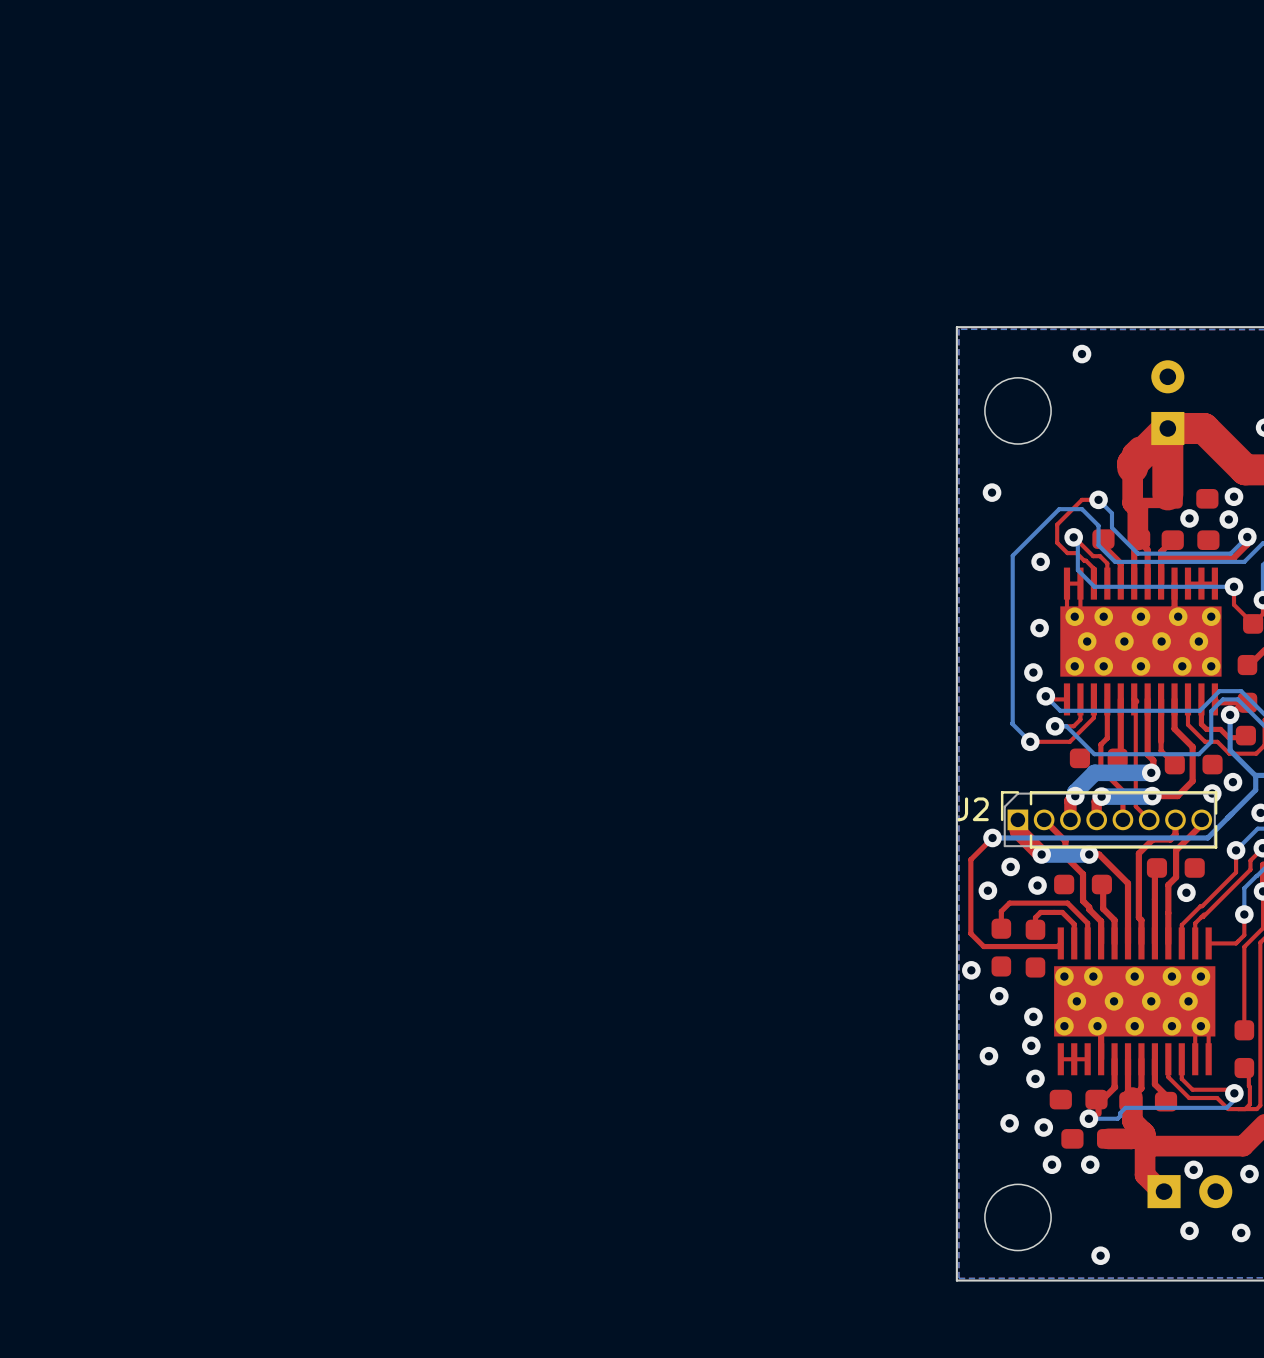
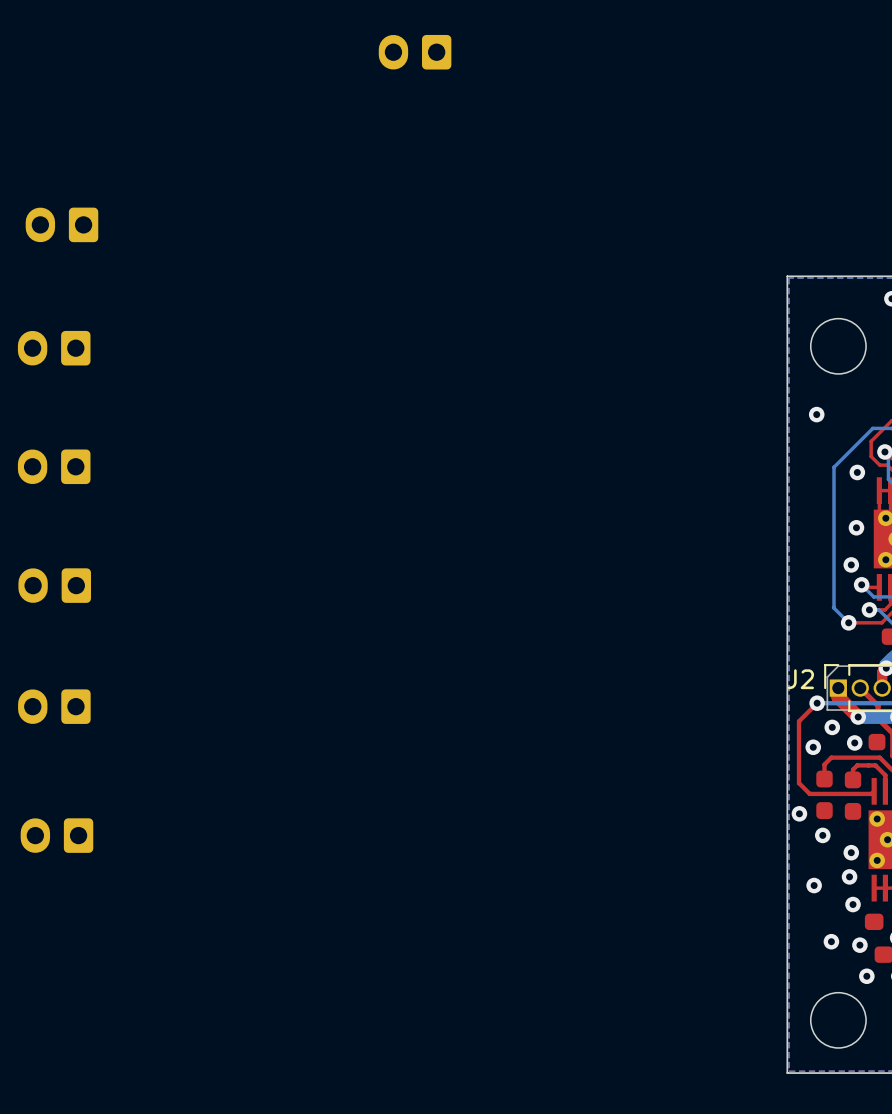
part: none -> (415, 52)
part: none -> (61, 224)
part: none -> (54, 348)
part: none -> (54, 466)
part: none -> (54, 585)
part: none -> (54, 706)
part: none -> (56, 835)

